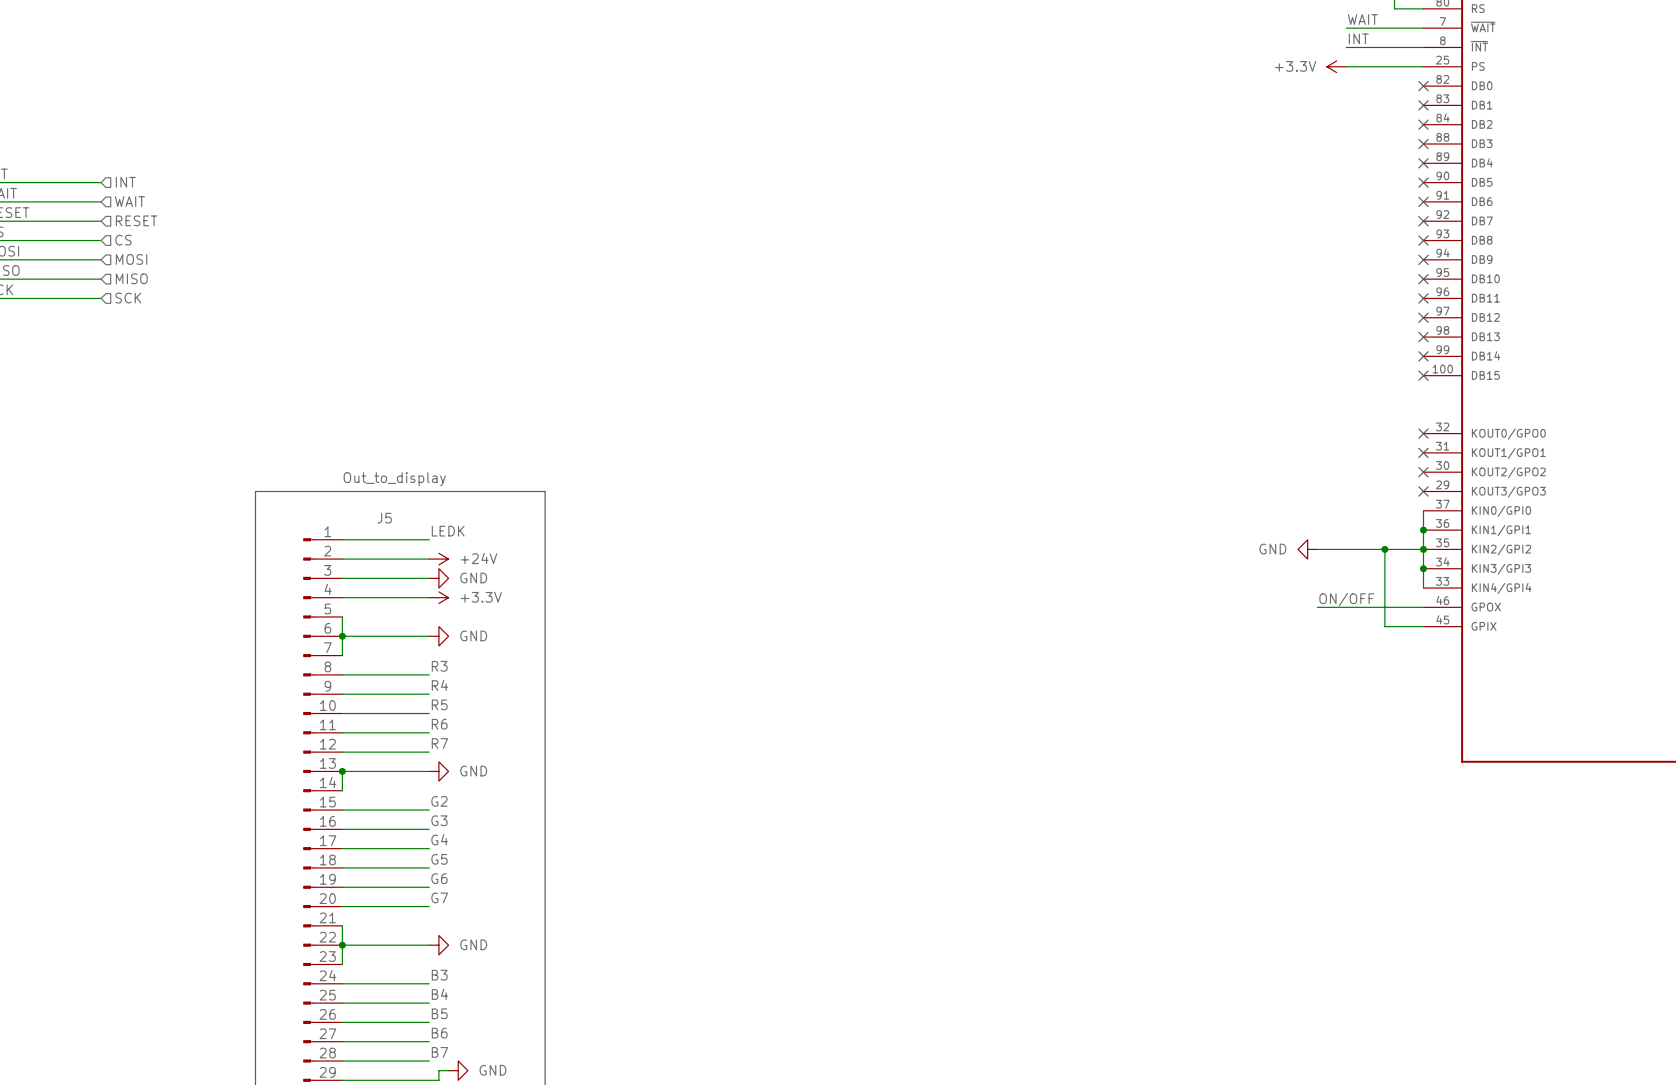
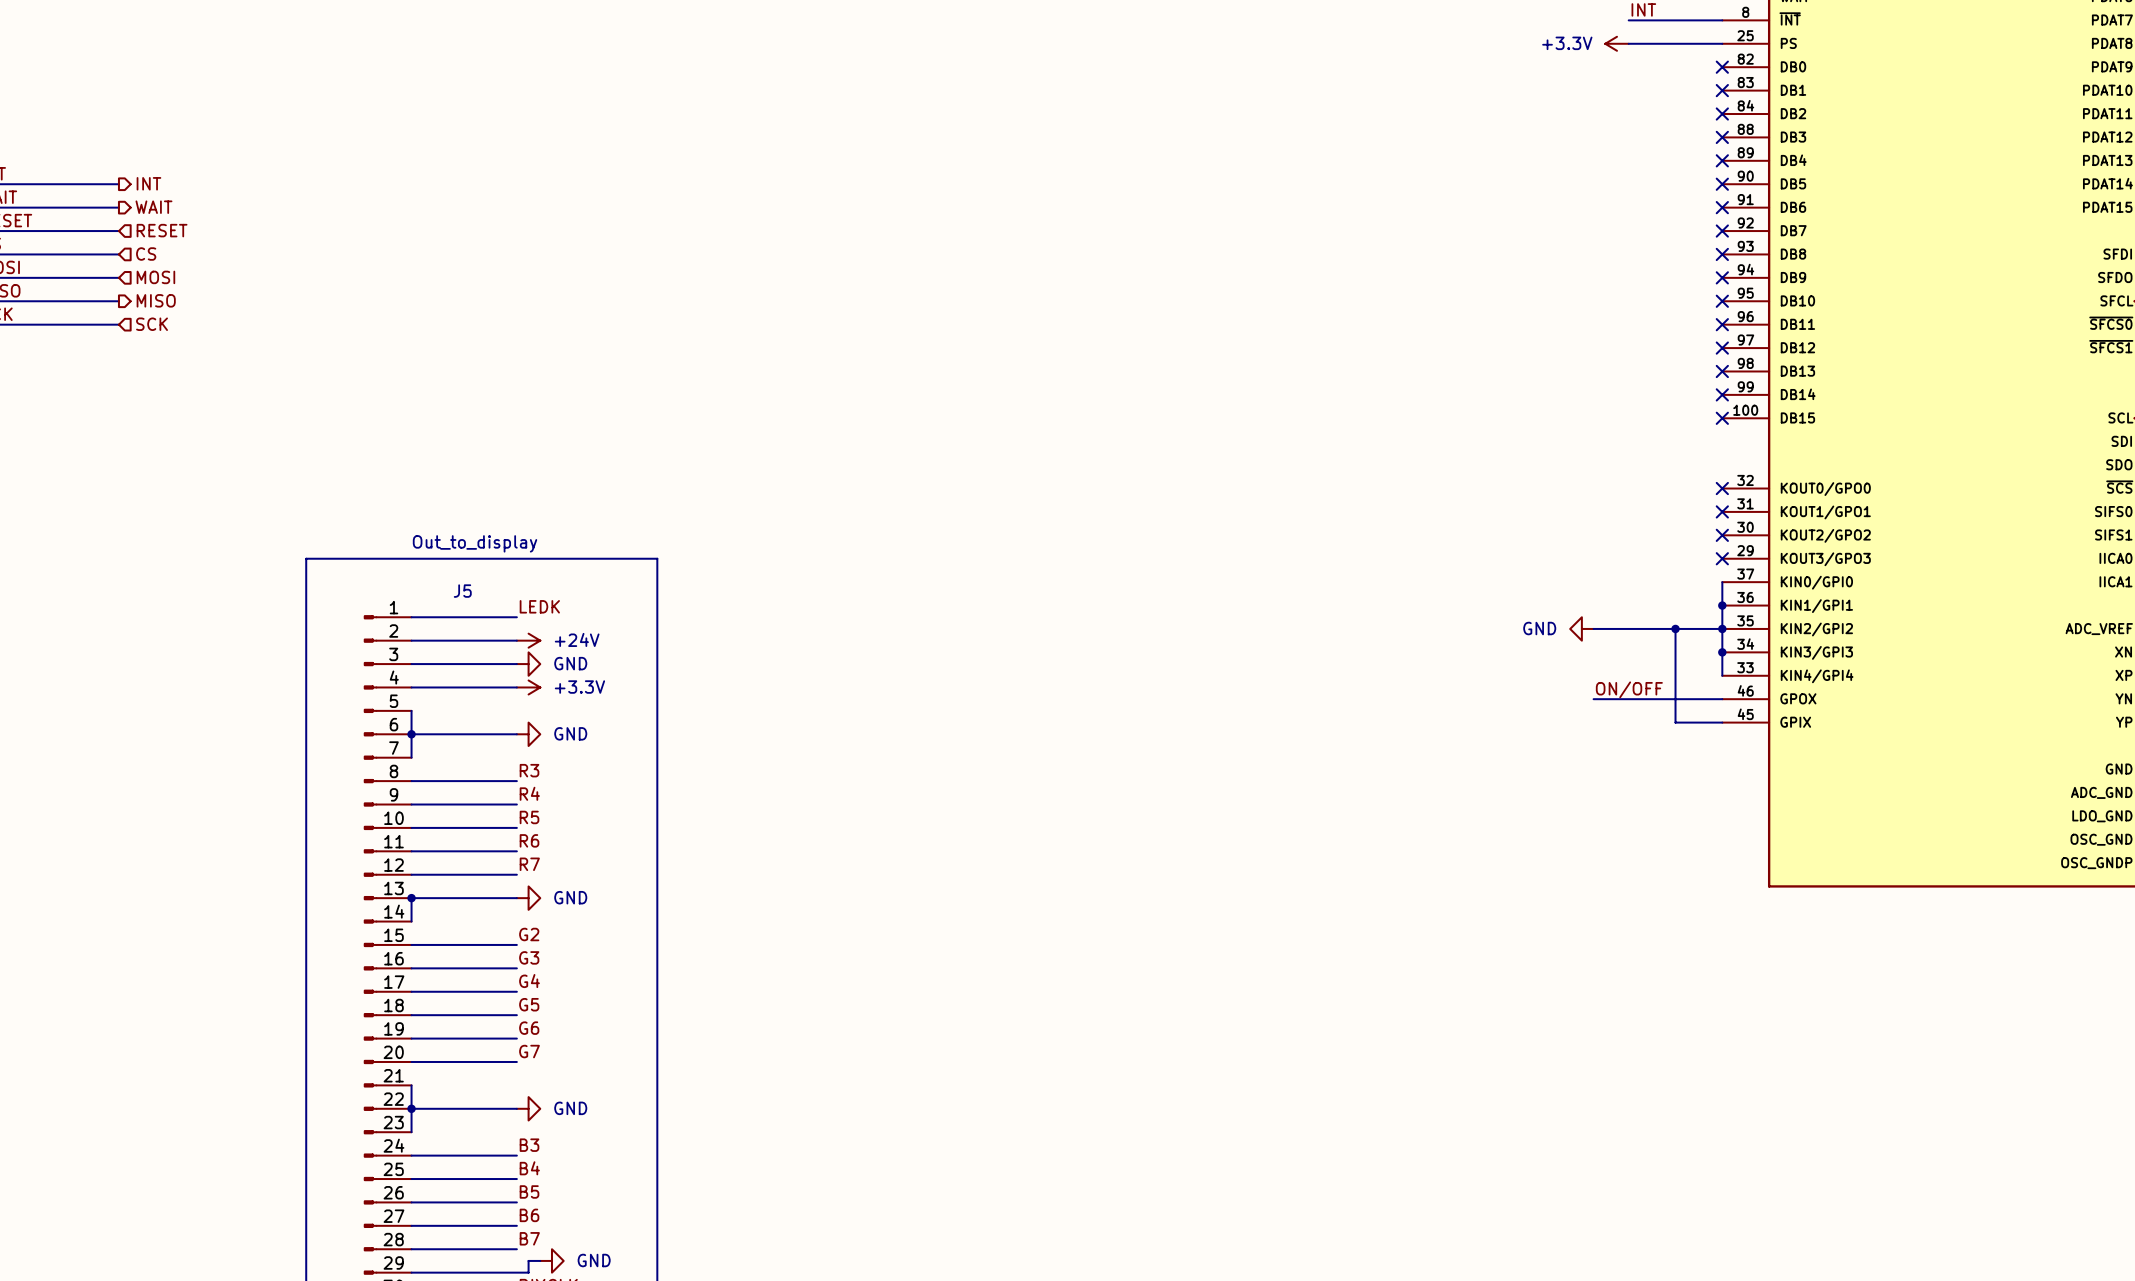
hierarchical label shape: input (125, 182) -> output (148, 183)
hierarchical label shape: input (129, 201) -> output (153, 207)
hierarchical label shape: input (131, 278) -> output (156, 300)

